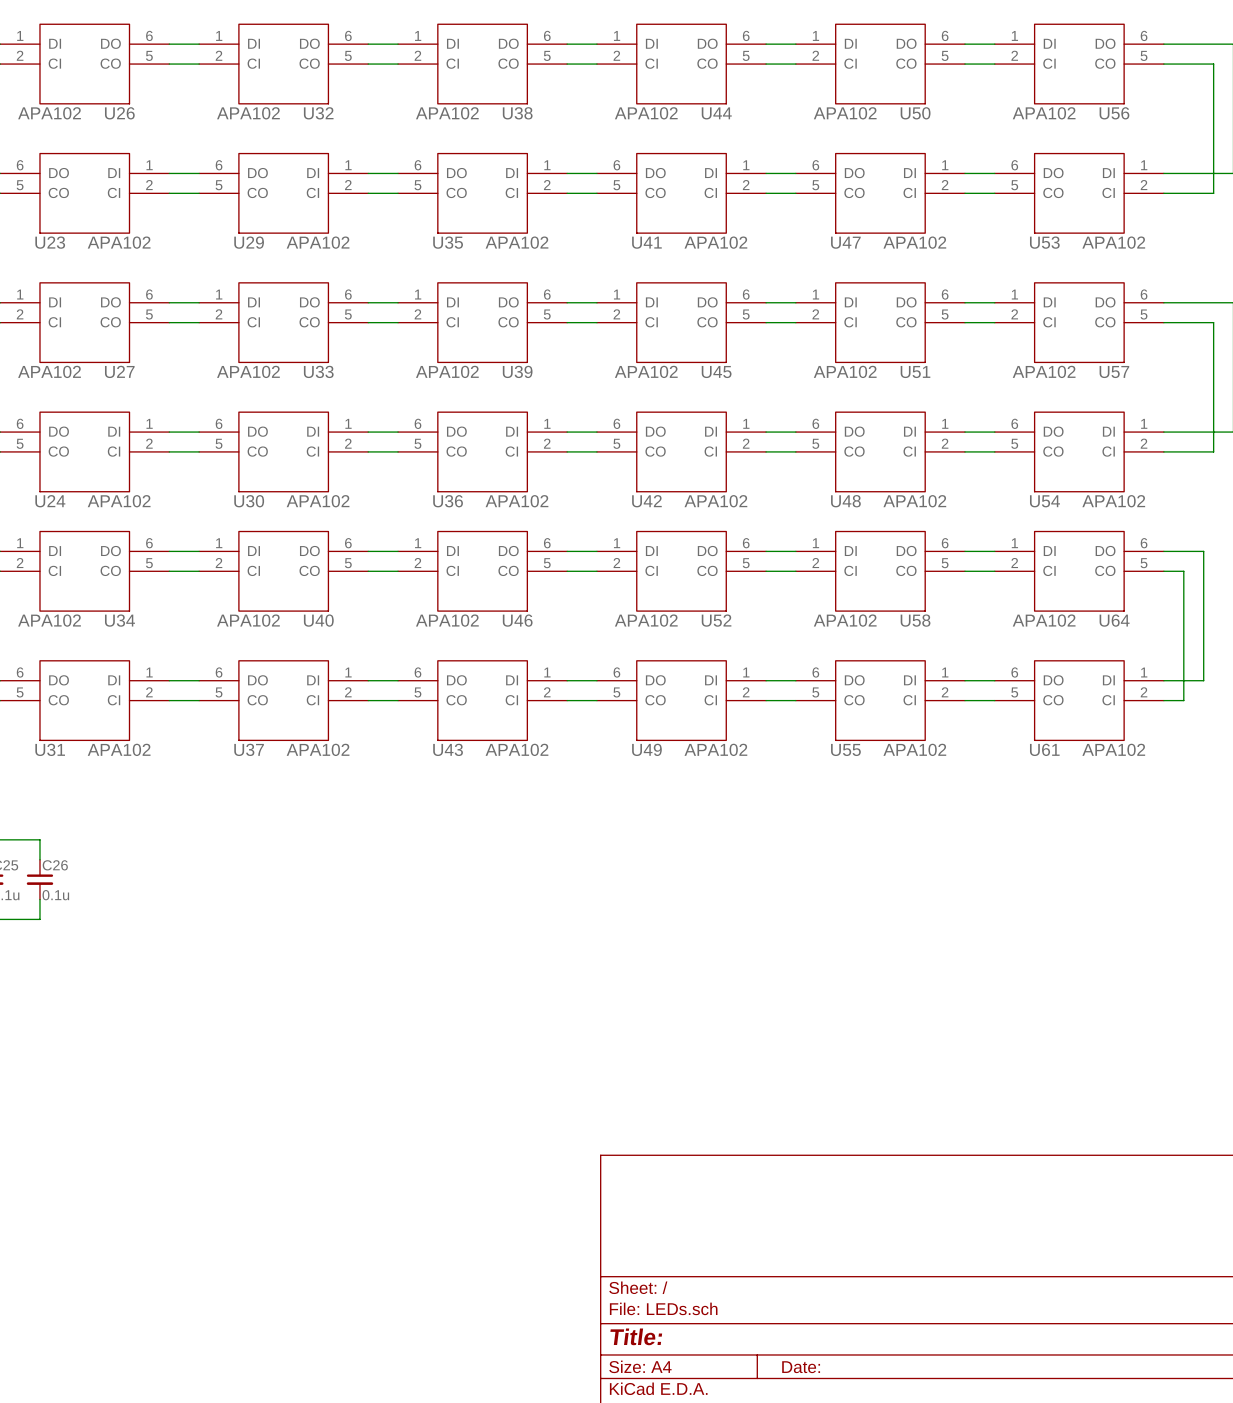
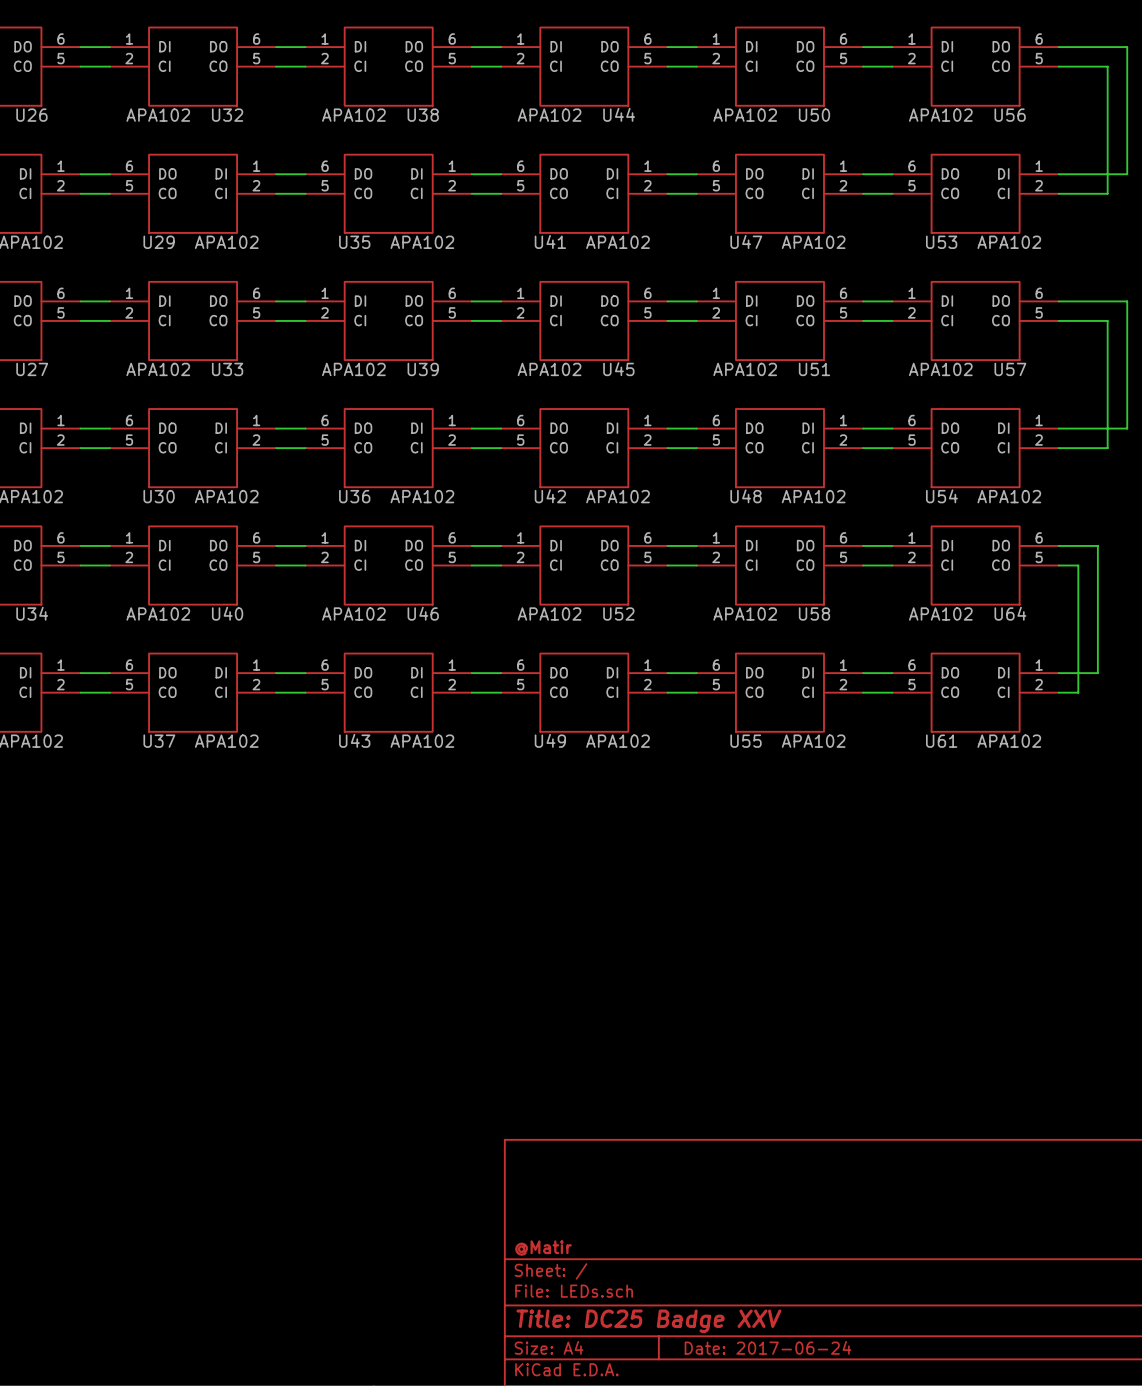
title block: none -> @Matir (543, 1248)
title block: Title: (636, 1336) -> Title: DC25 Badge XXV (648, 1321)
title block: Date: (801, 1367) -> Date: 2017-06-24 (768, 1347)

